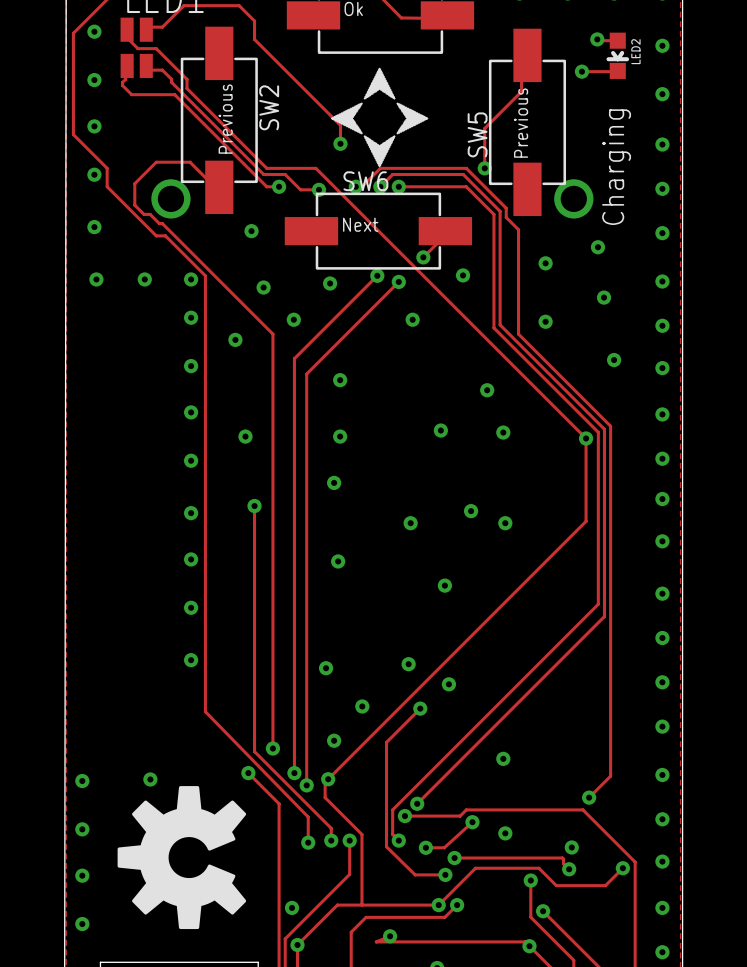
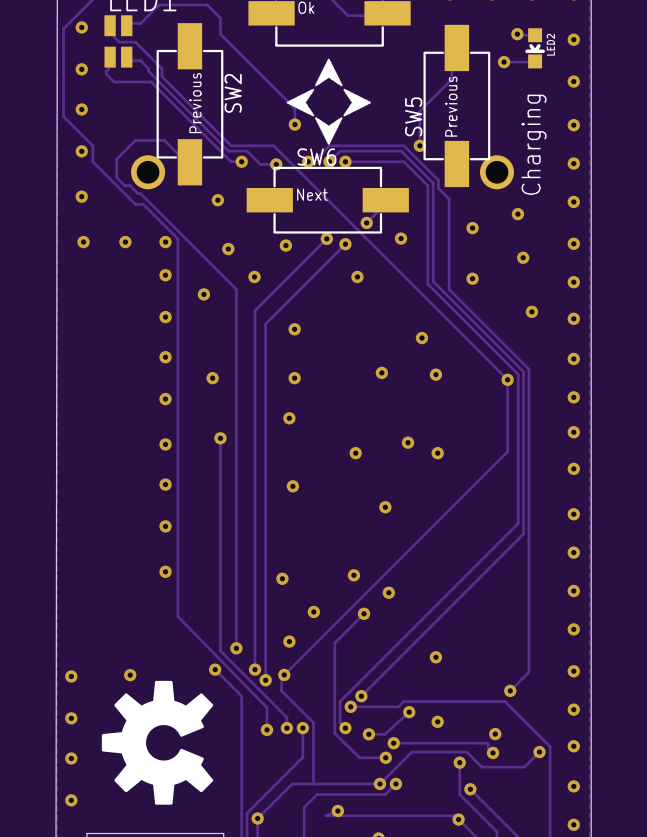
via: (292, 907) -> none

